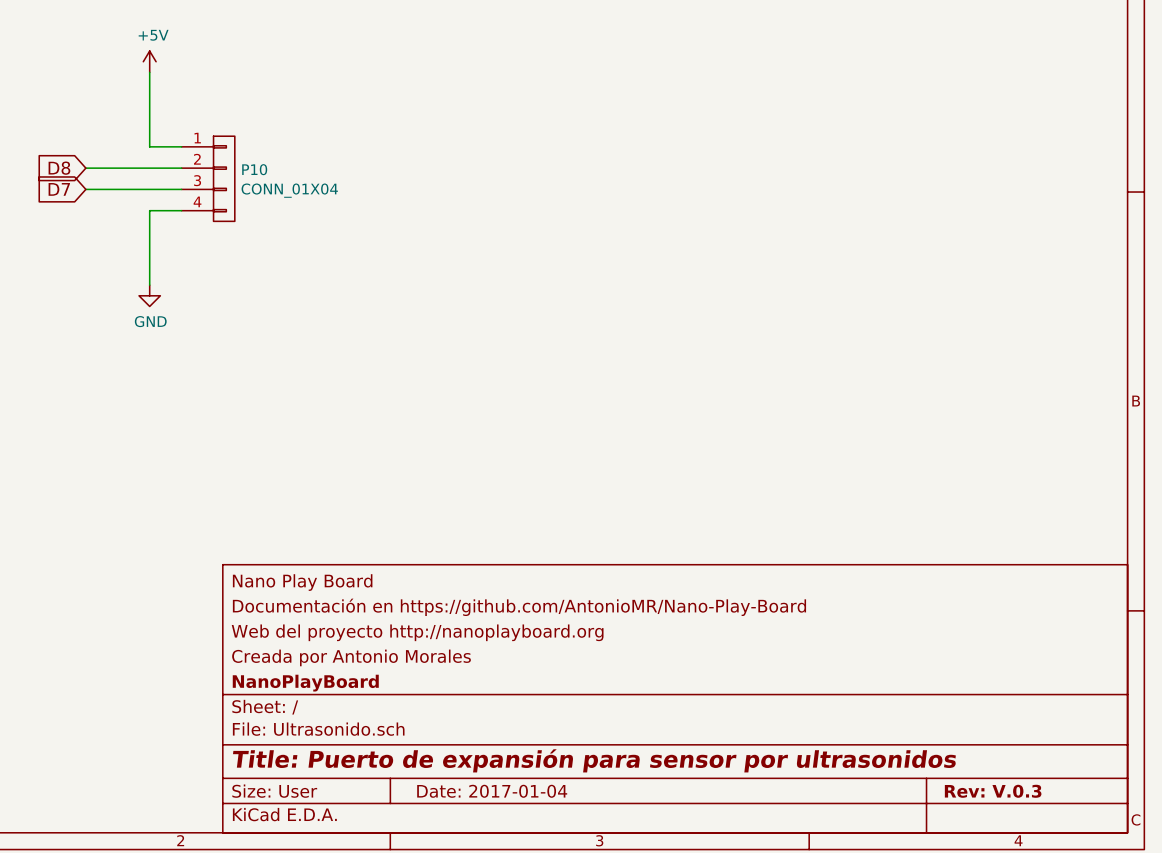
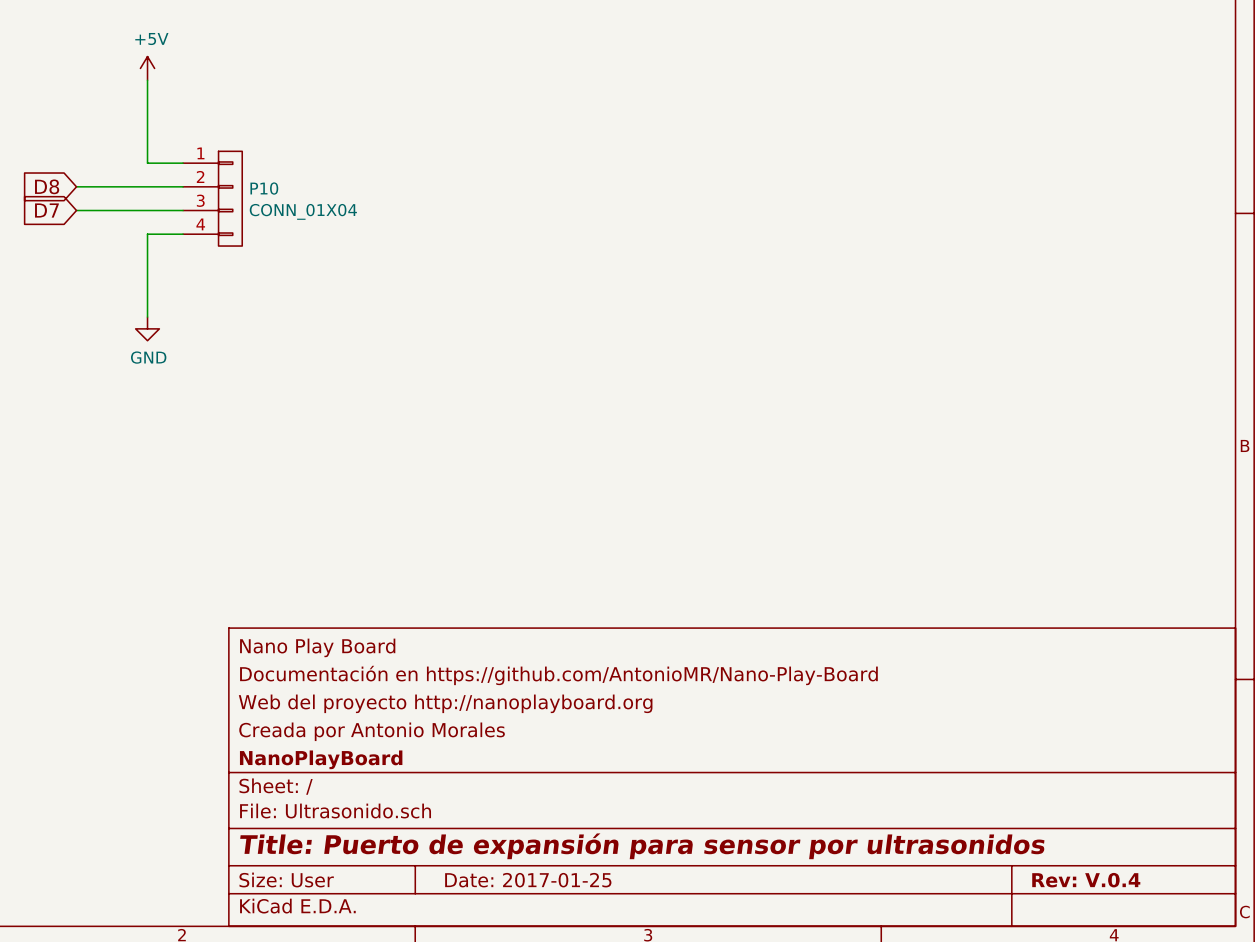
title block: Date: 2017-01-04 (492, 791) -> Date: 2017-01-25 (528, 880)
title block: Rev: V.0.3 (993, 791) -> Rev: V.0.4 (1086, 880)

